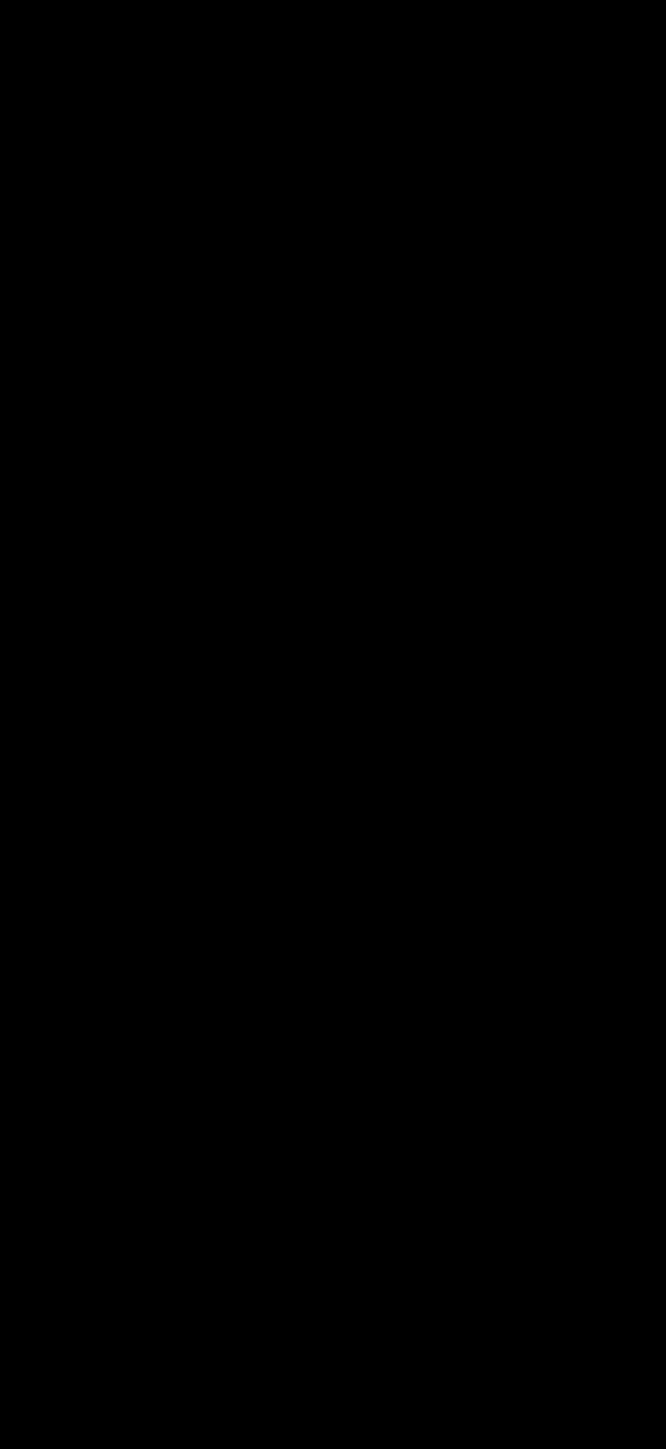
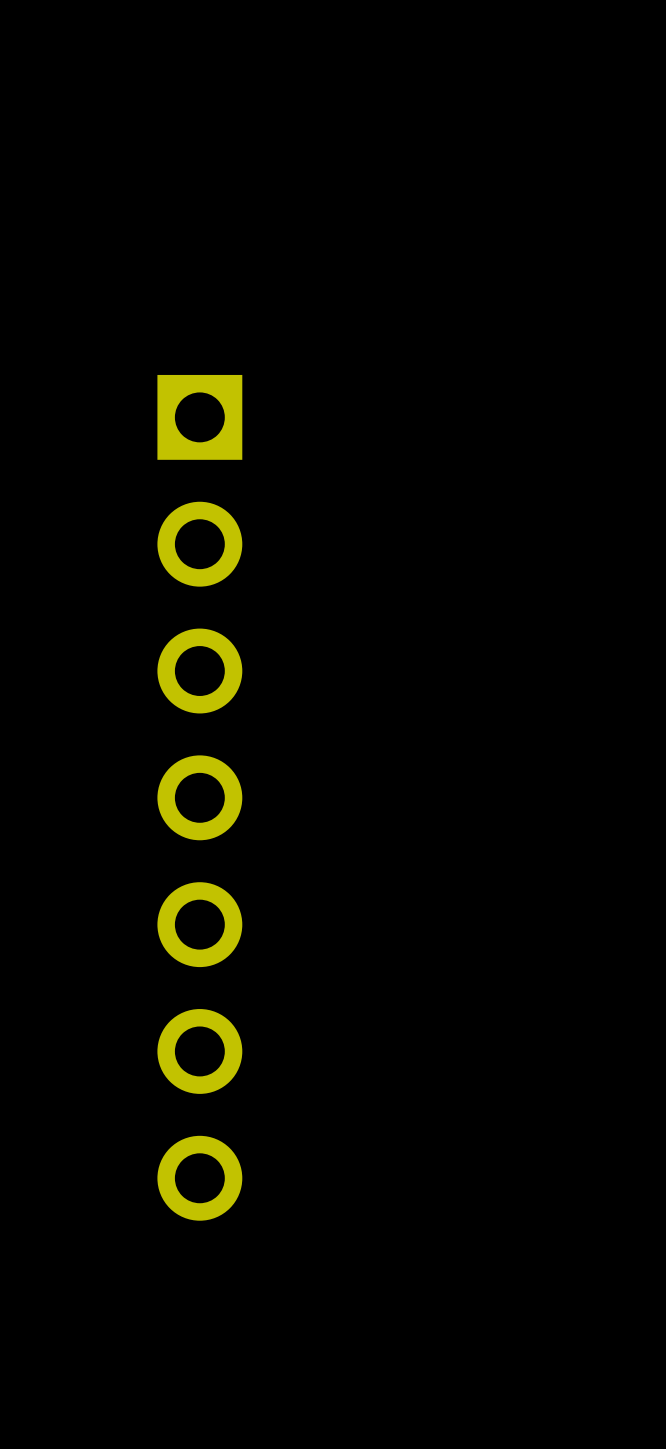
part: none -> (199, 797)

